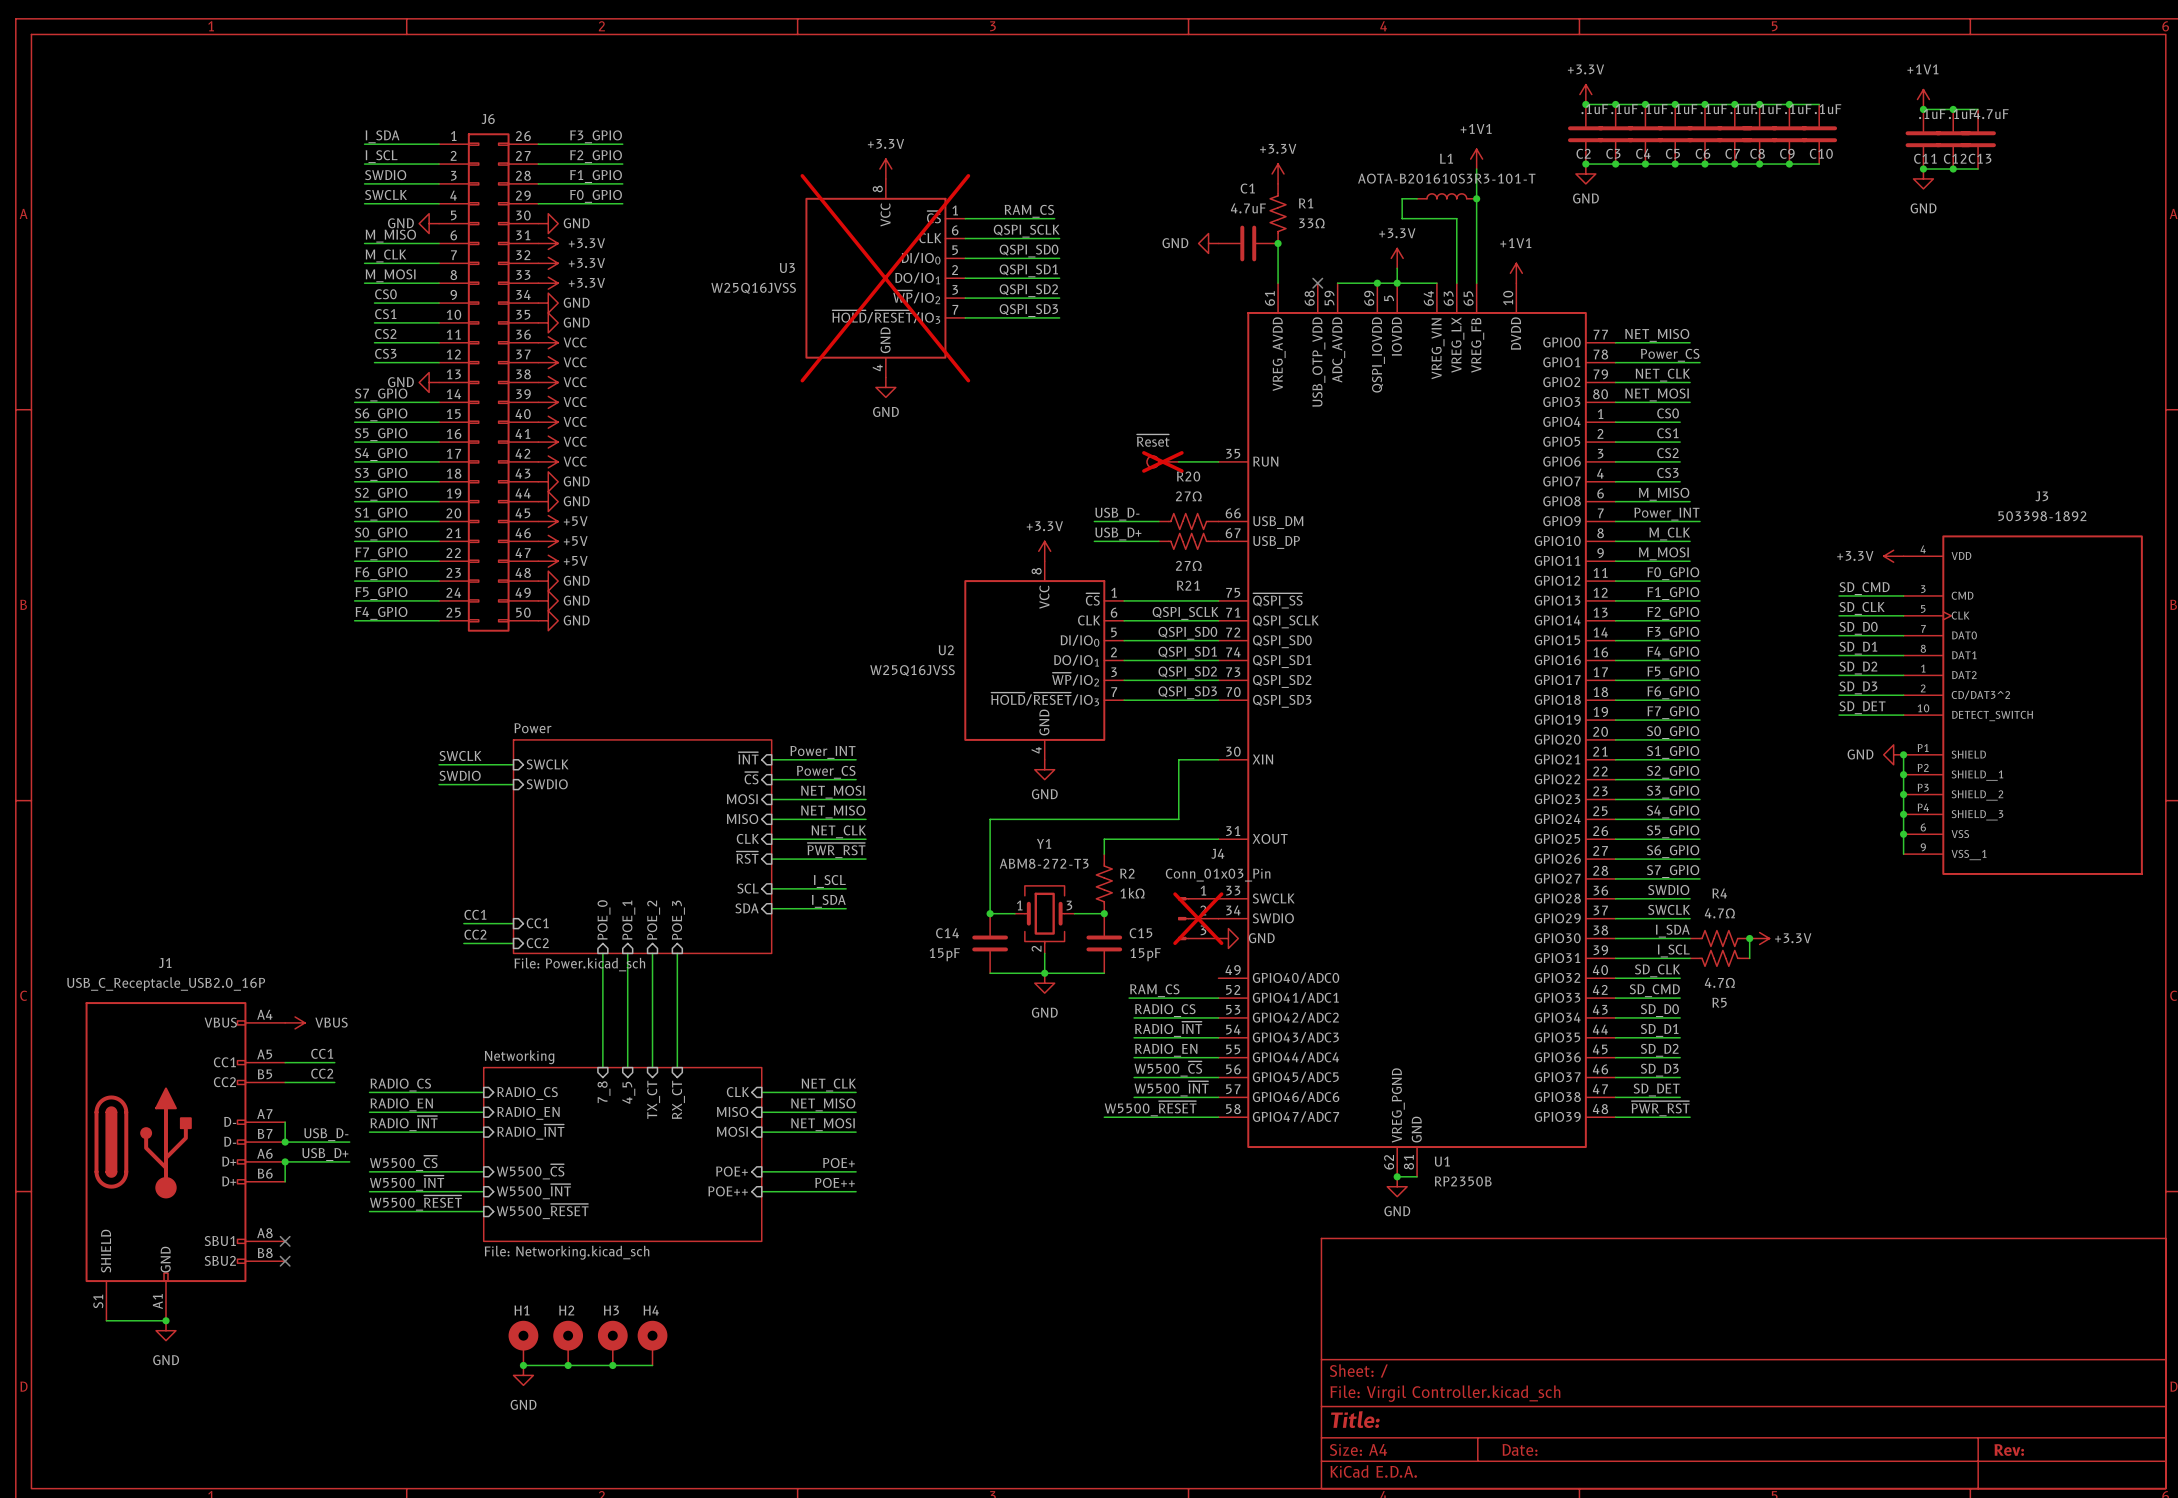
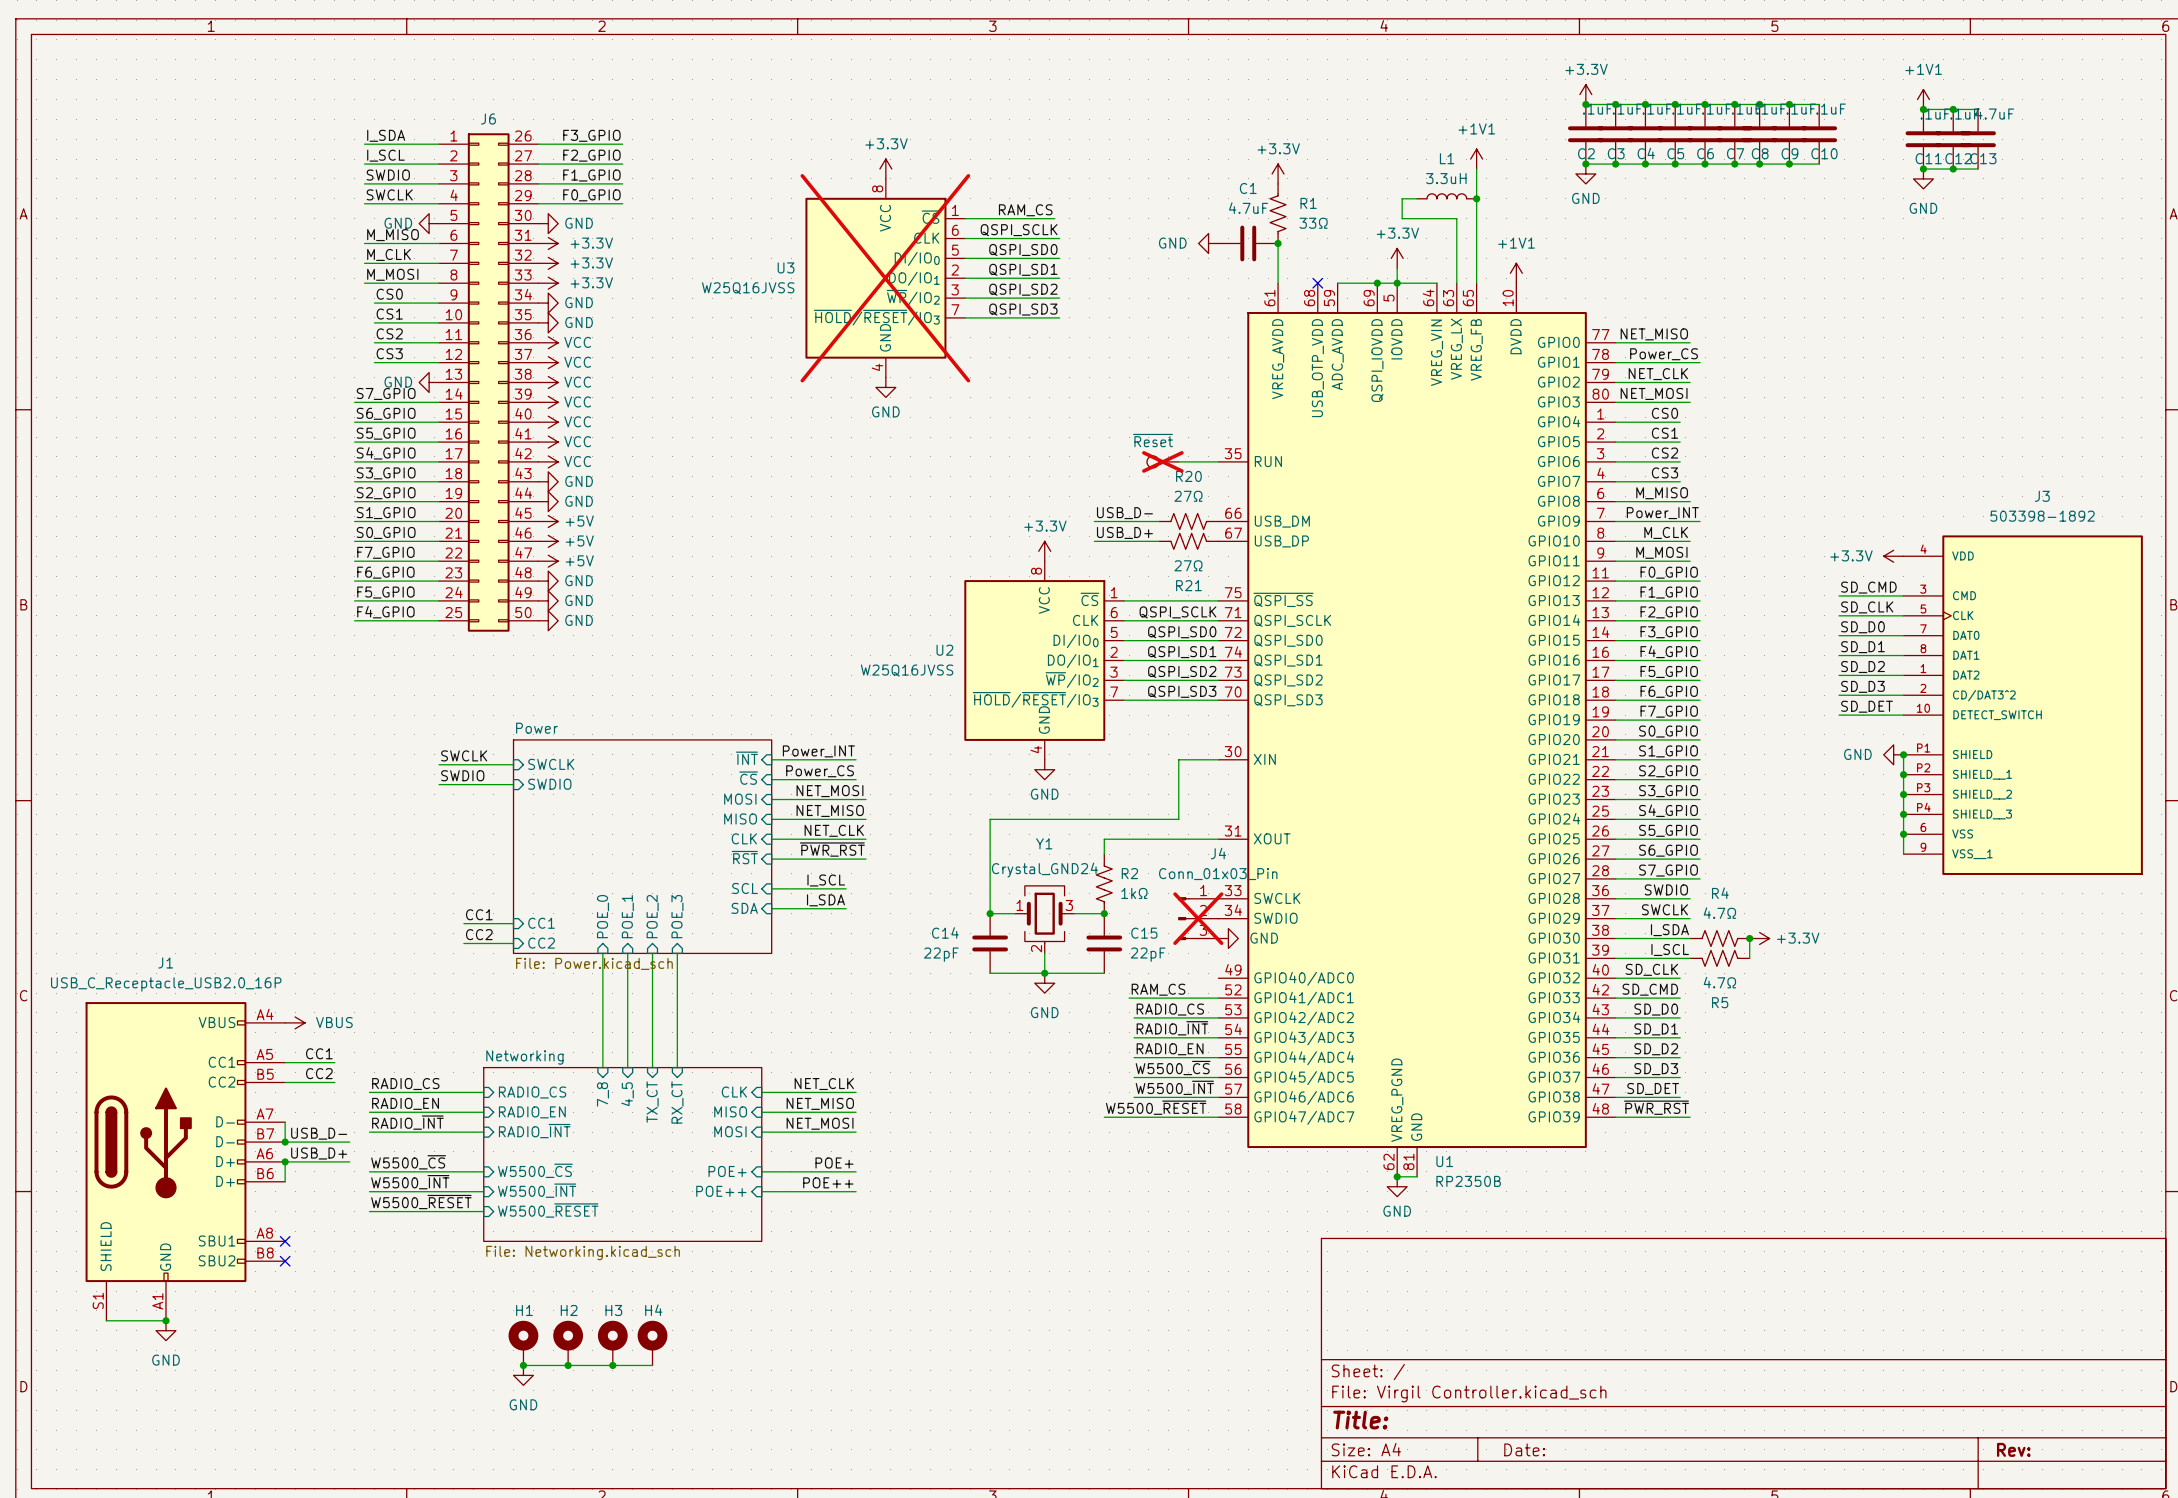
L1 value: AOTA-B201610S3R3-101-T (1446, 178) -> 3.3uH (1446, 178)
Y1 value: ABM8-272-T3 (1044, 863) -> Crystal_GND24 (1044, 870)
C14 value: 15pF (944, 954) -> 22pF (941, 954)
C15 value: 15pF (1145, 954) -> 22pF (1148, 954)

